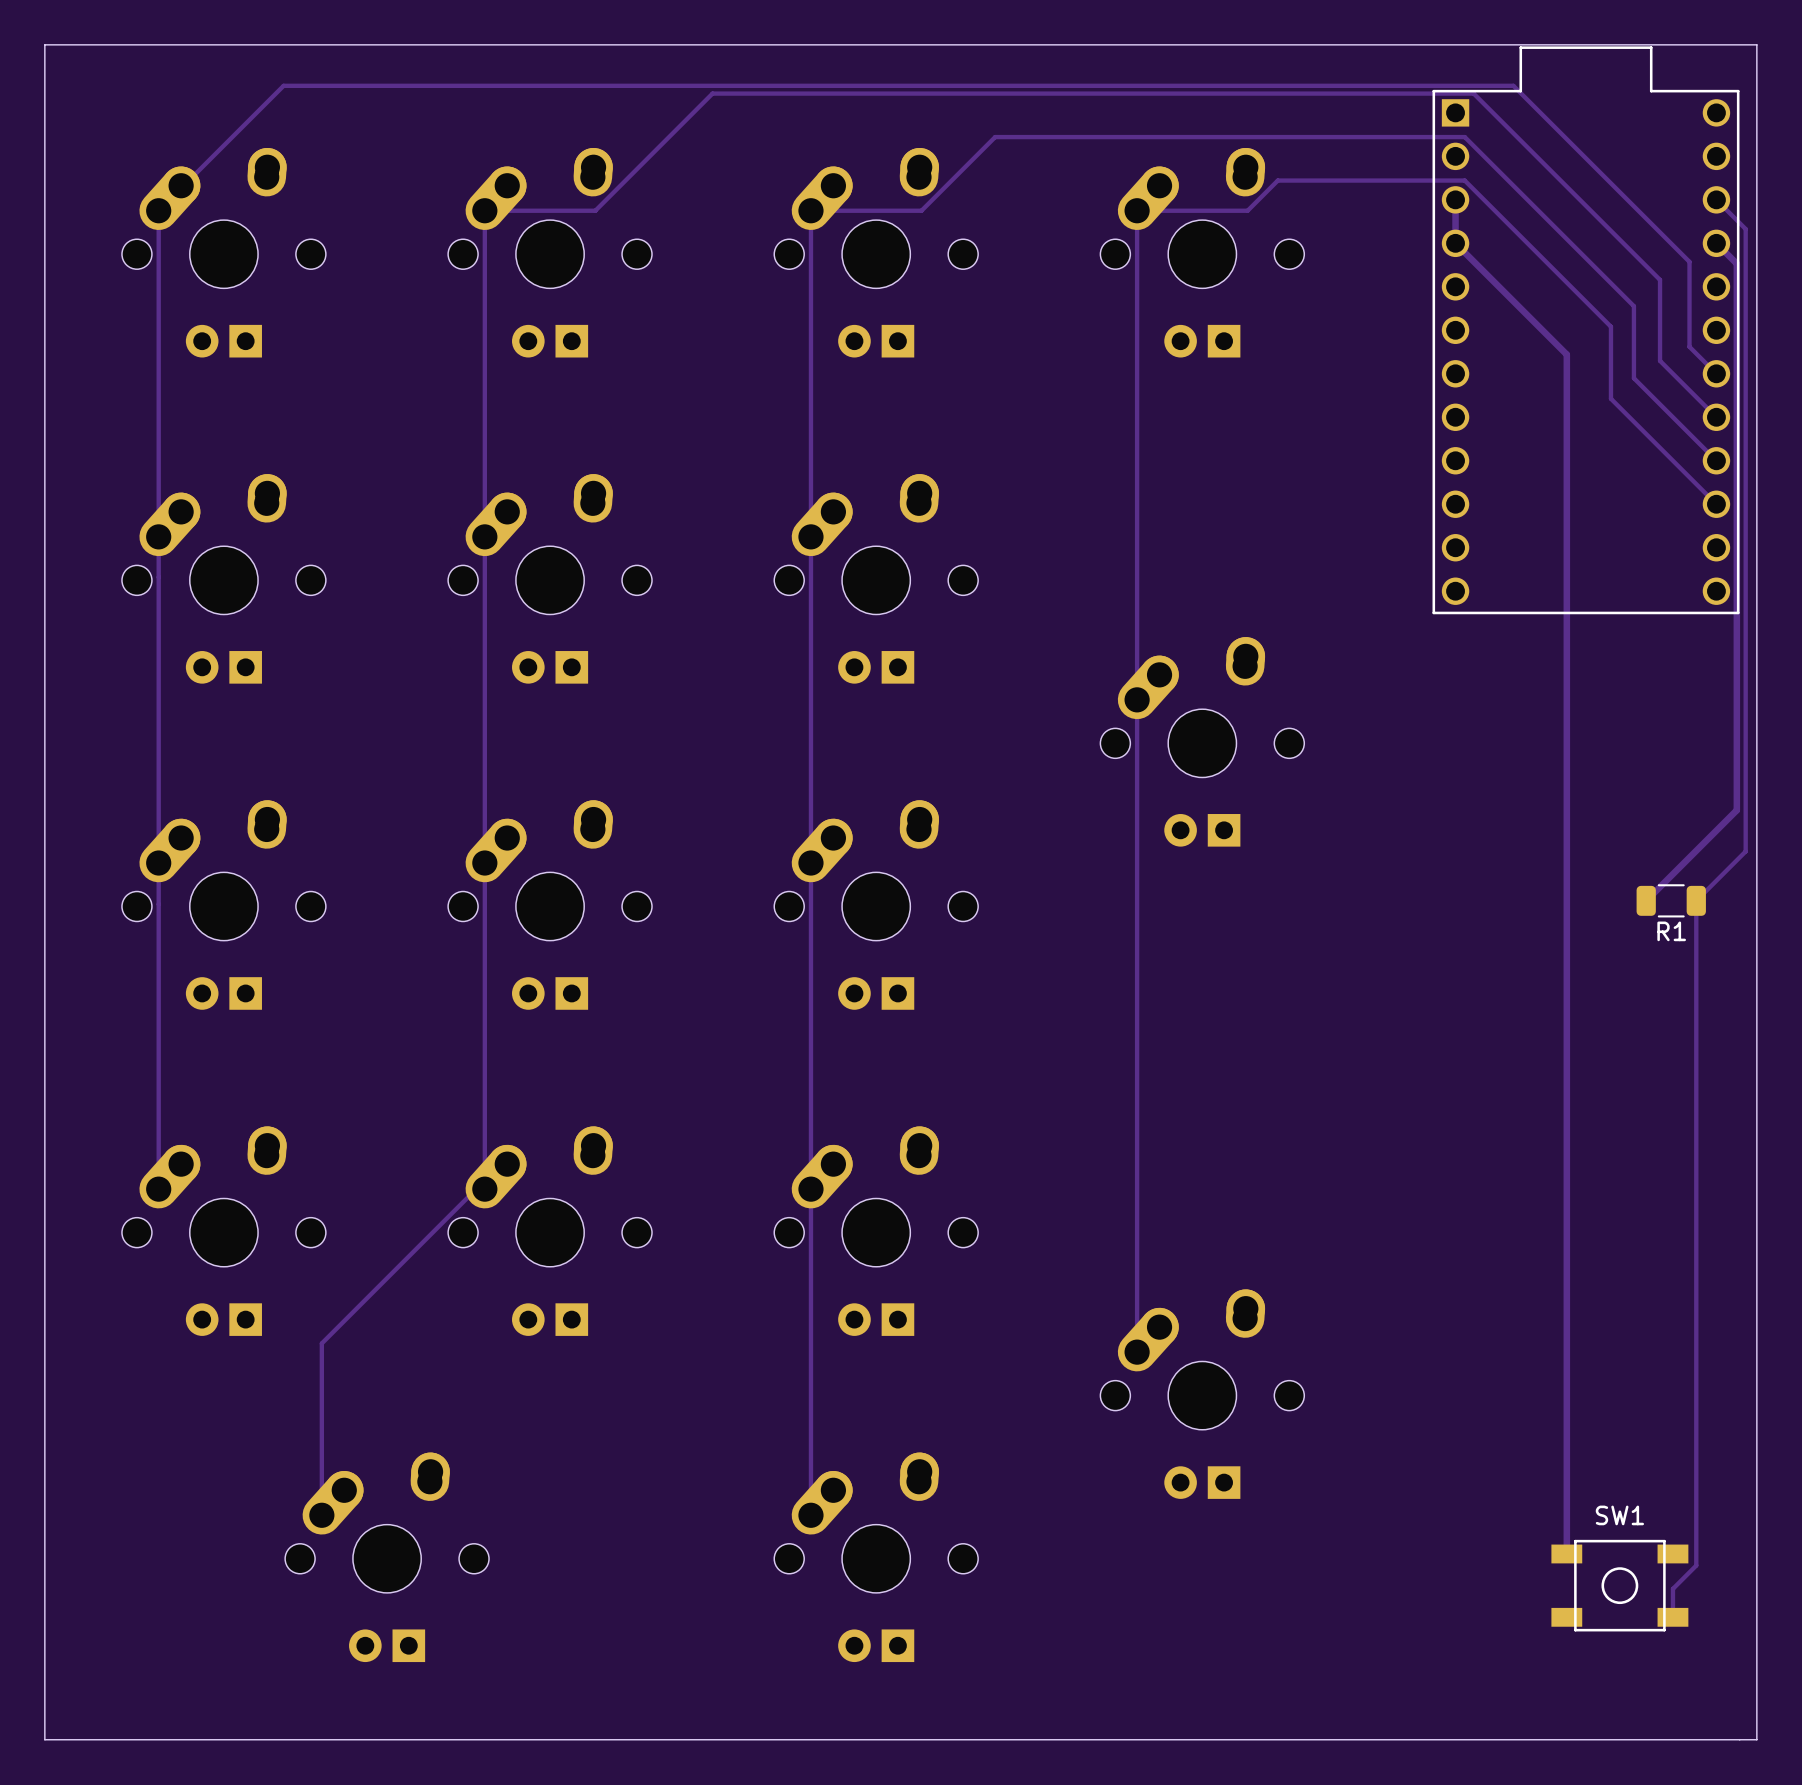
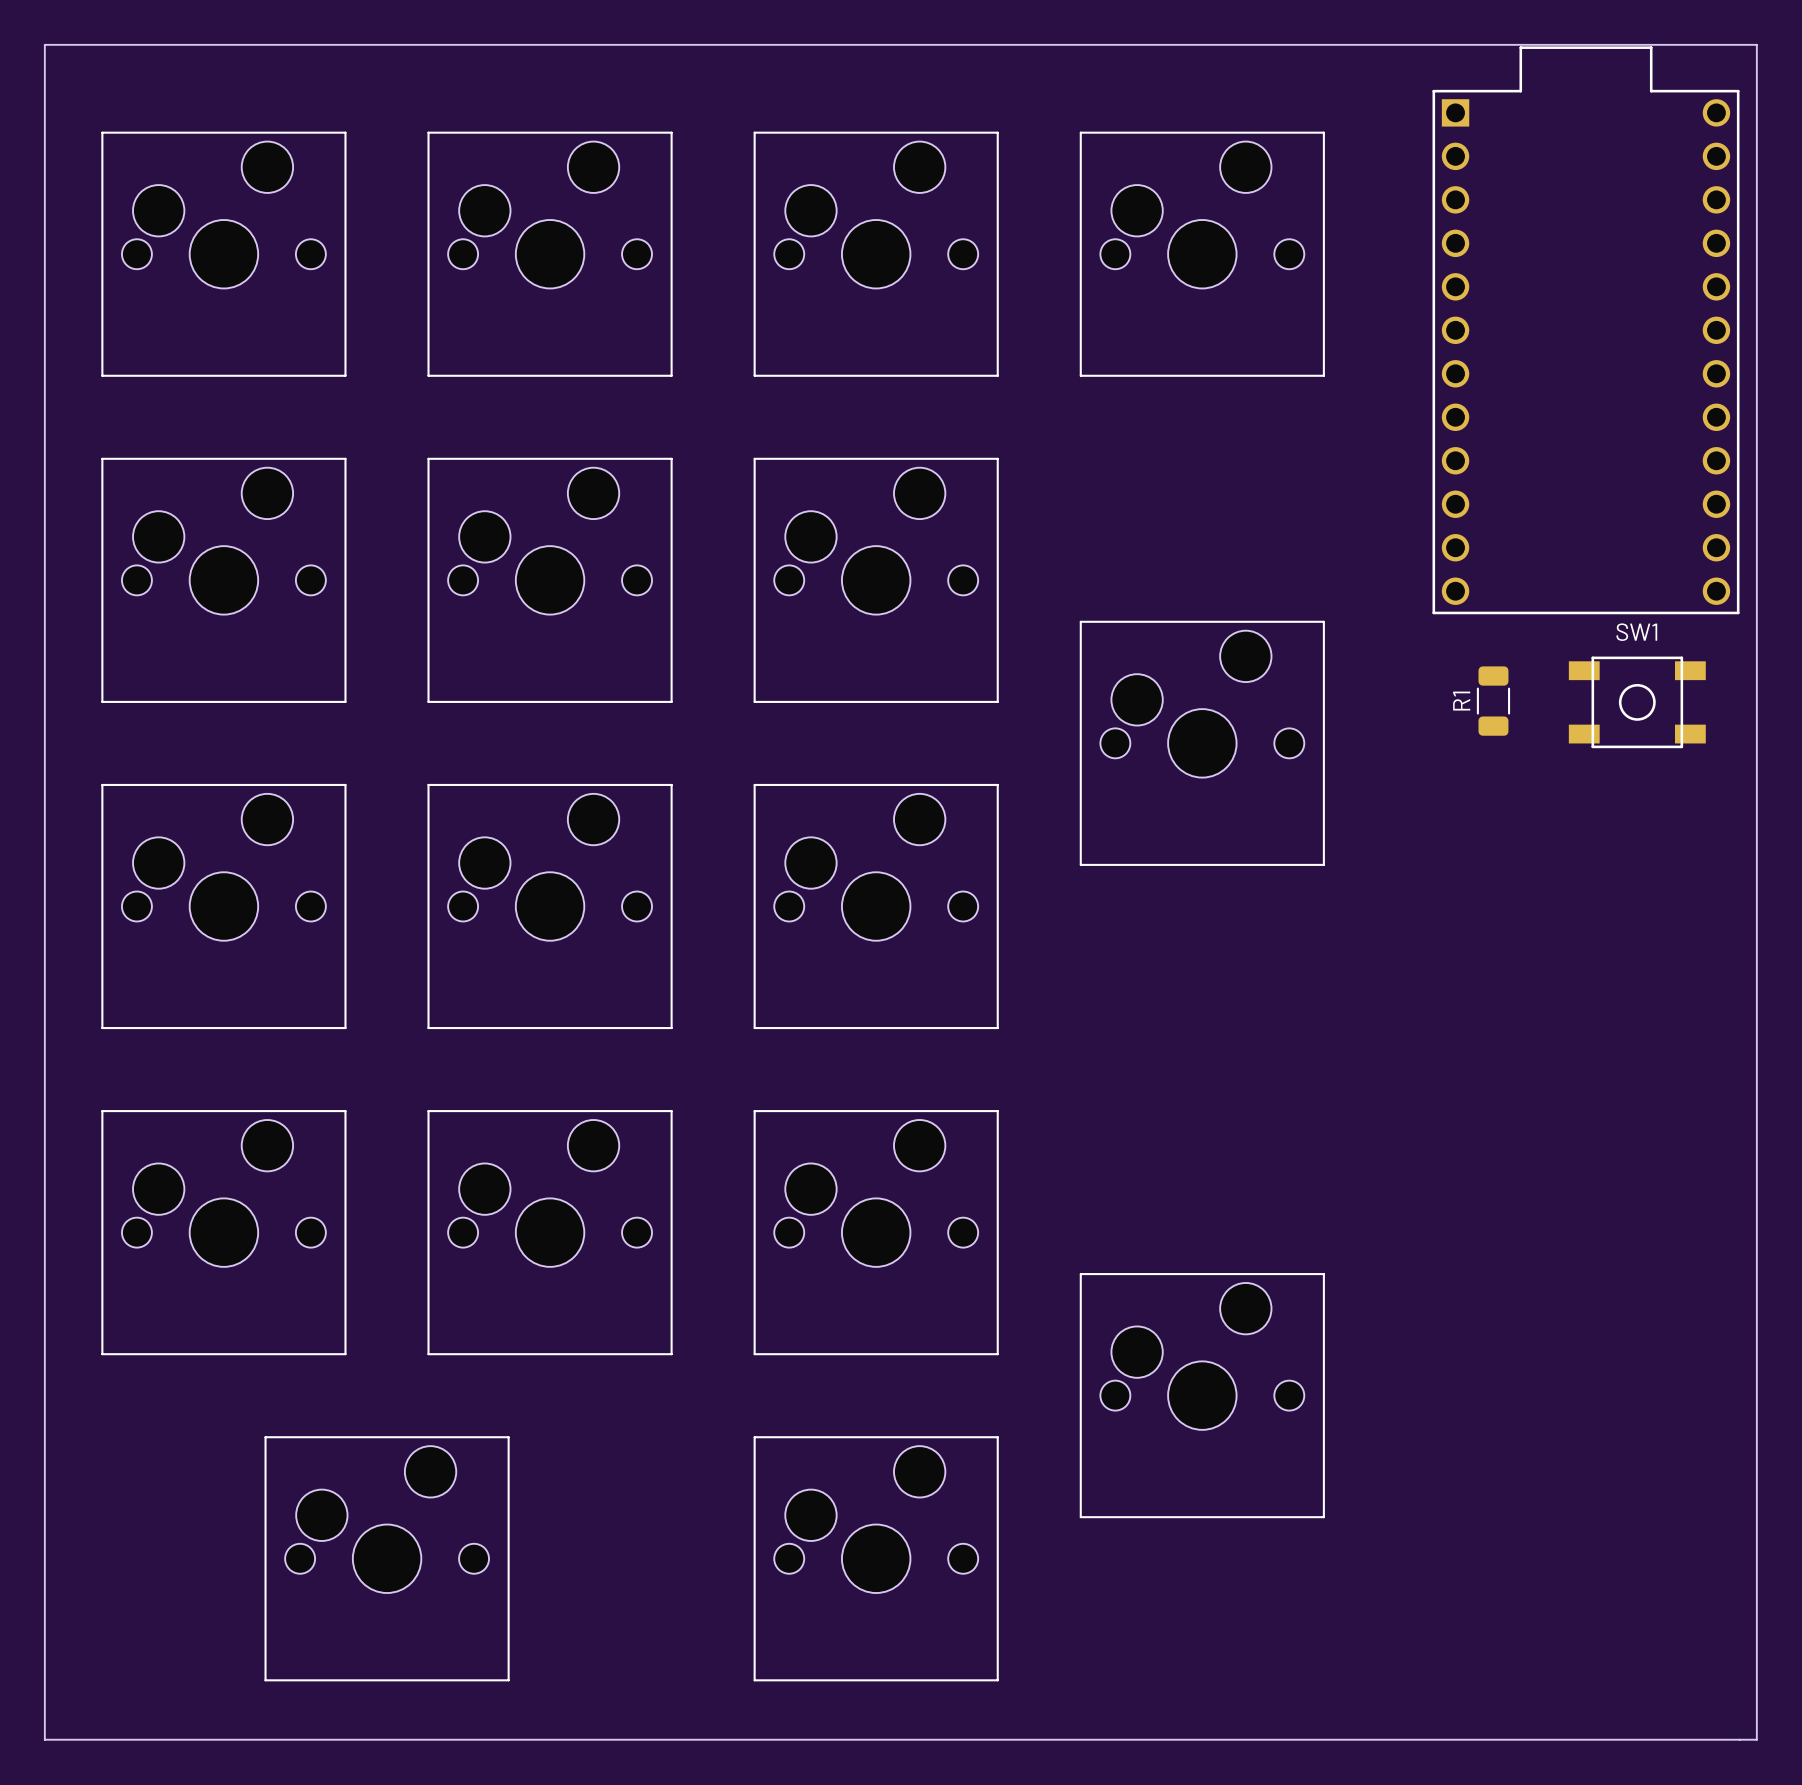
part footprint: [121, 147, 326, 358] -> [101, 131, 347, 377]
part footprint: [448, 147, 653, 358] -> [427, 131, 673, 377]
part footprint: [774, 147, 979, 358] -> [753, 131, 999, 377]
part footprint: [1100, 147, 1305, 358] -> [1079, 131, 1325, 377]
track: (1455, 199) (1455, 243) (1566, 354) (1566, 1553) -> none
track: (1716, 199) (1745, 229) (1745, 851) (1696, 900) (1696, 1565) (1672, 1588) (1672, 1617) -> none
track: (1716, 243) (1736, 263) (1736, 810) (1646, 900) -> none
track: (1716, 373) (1689, 346) (1689, 261) (1513, 85) (283, 85) (158, 210) (158, 1189) -> none
track: (1716, 417) (1660, 360) (1660, 279) (1473, 93) (712, 93) (595, 210) (484, 210) (484, 1189) (476, 1189) (321, 1343) (321, 1515) -> none
track: (1716, 460) (1633, 378) (1633, 306) (1464, 137) (995, 137) (921, 210) (810, 210) (810, 1515) -> none
part footprint: [121, 474, 326, 684] -> [101, 457, 347, 703]
part footprint: [448, 474, 653, 684] -> [427, 457, 673, 703]
part footprint: [774, 474, 979, 684] -> [753, 457, 999, 703]
track: (1716, 504) (1610, 398) (1610, 326) (1464, 180) (1277, 180) (1247, 210) (1137, 210) (1137, 1352) -> none
part footprint: [1100, 637, 1305, 847] -> [1079, 620, 1325, 866]
part footprint: [121, 800, 326, 1010] -> [101, 783, 347, 1030]
part footprint: [448, 800, 653, 1010] -> [427, 783, 673, 1030]
part footprint: [774, 800, 979, 1010] -> [753, 783, 999, 1030]
R1 rotation: 0° (1671, 900) -> 90° clockwise (1493, 701)
R1 position: (1671, 900) -> (1493, 701)
part footprint: [121, 1126, 326, 1336] -> [101, 1110, 347, 1356]
part footprint: [448, 1126, 653, 1336] -> [427, 1110, 673, 1356]
part footprint: [774, 1126, 979, 1336] -> [753, 1110, 999, 1356]
part footprint: [1100, 1289, 1305, 1499] -> [1079, 1273, 1325, 1519]
part footprint: [285, 1452, 490, 1663] -> [264, 1436, 510, 1682]
part footprint: [774, 1452, 979, 1663] -> [753, 1436, 999, 1682]
SW1 position: (1619, 1585) -> (1637, 702)

